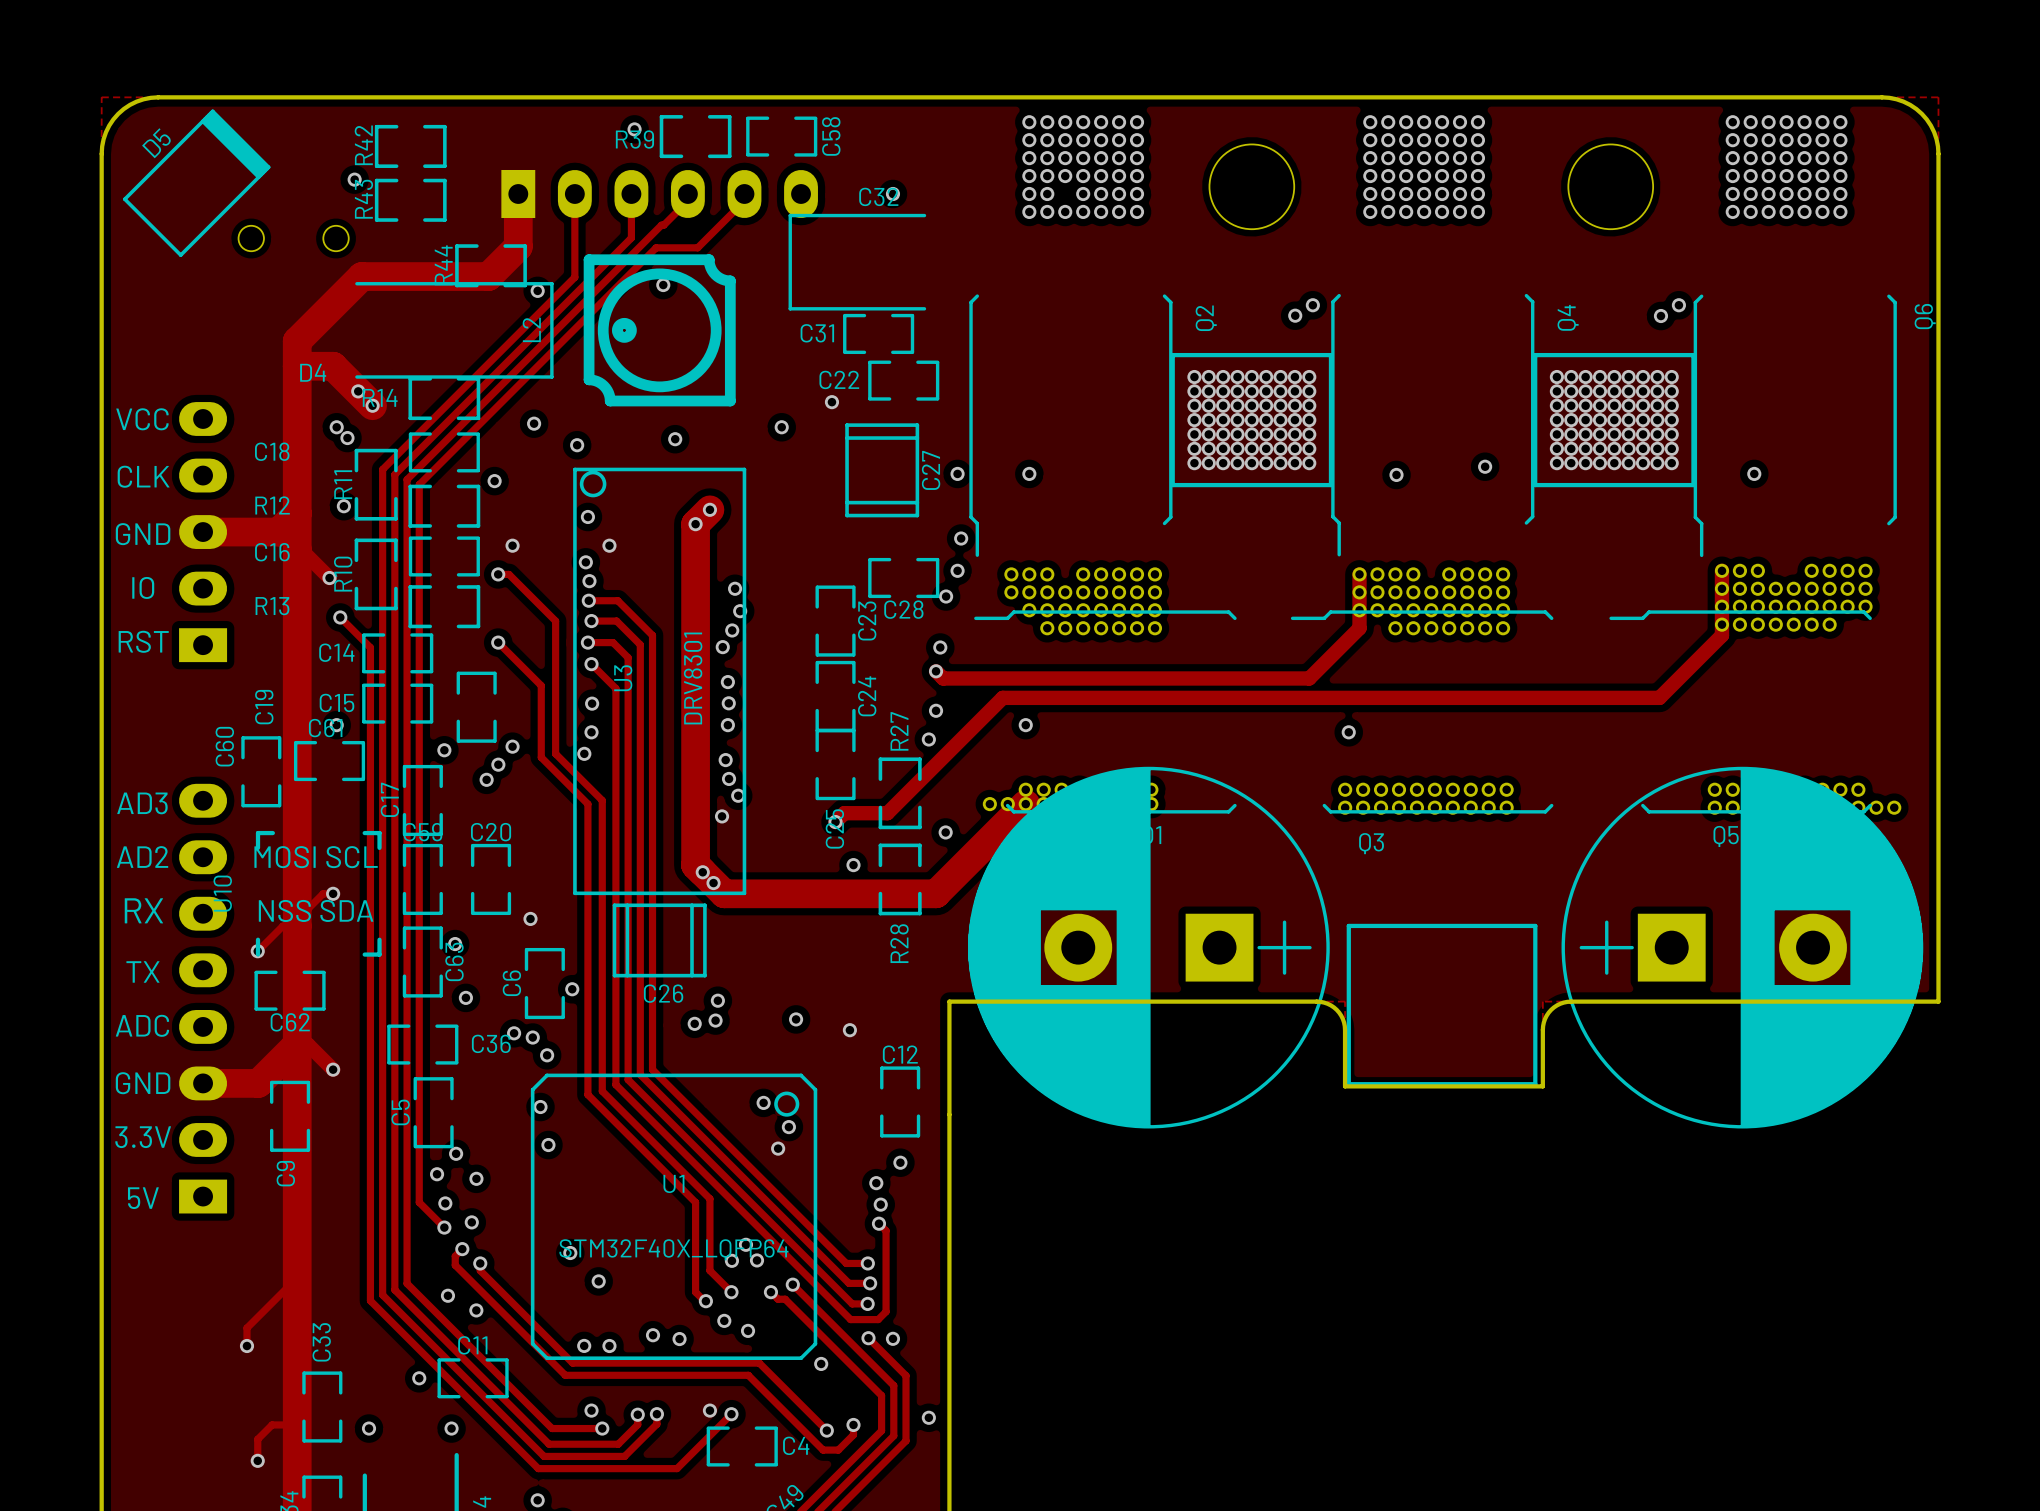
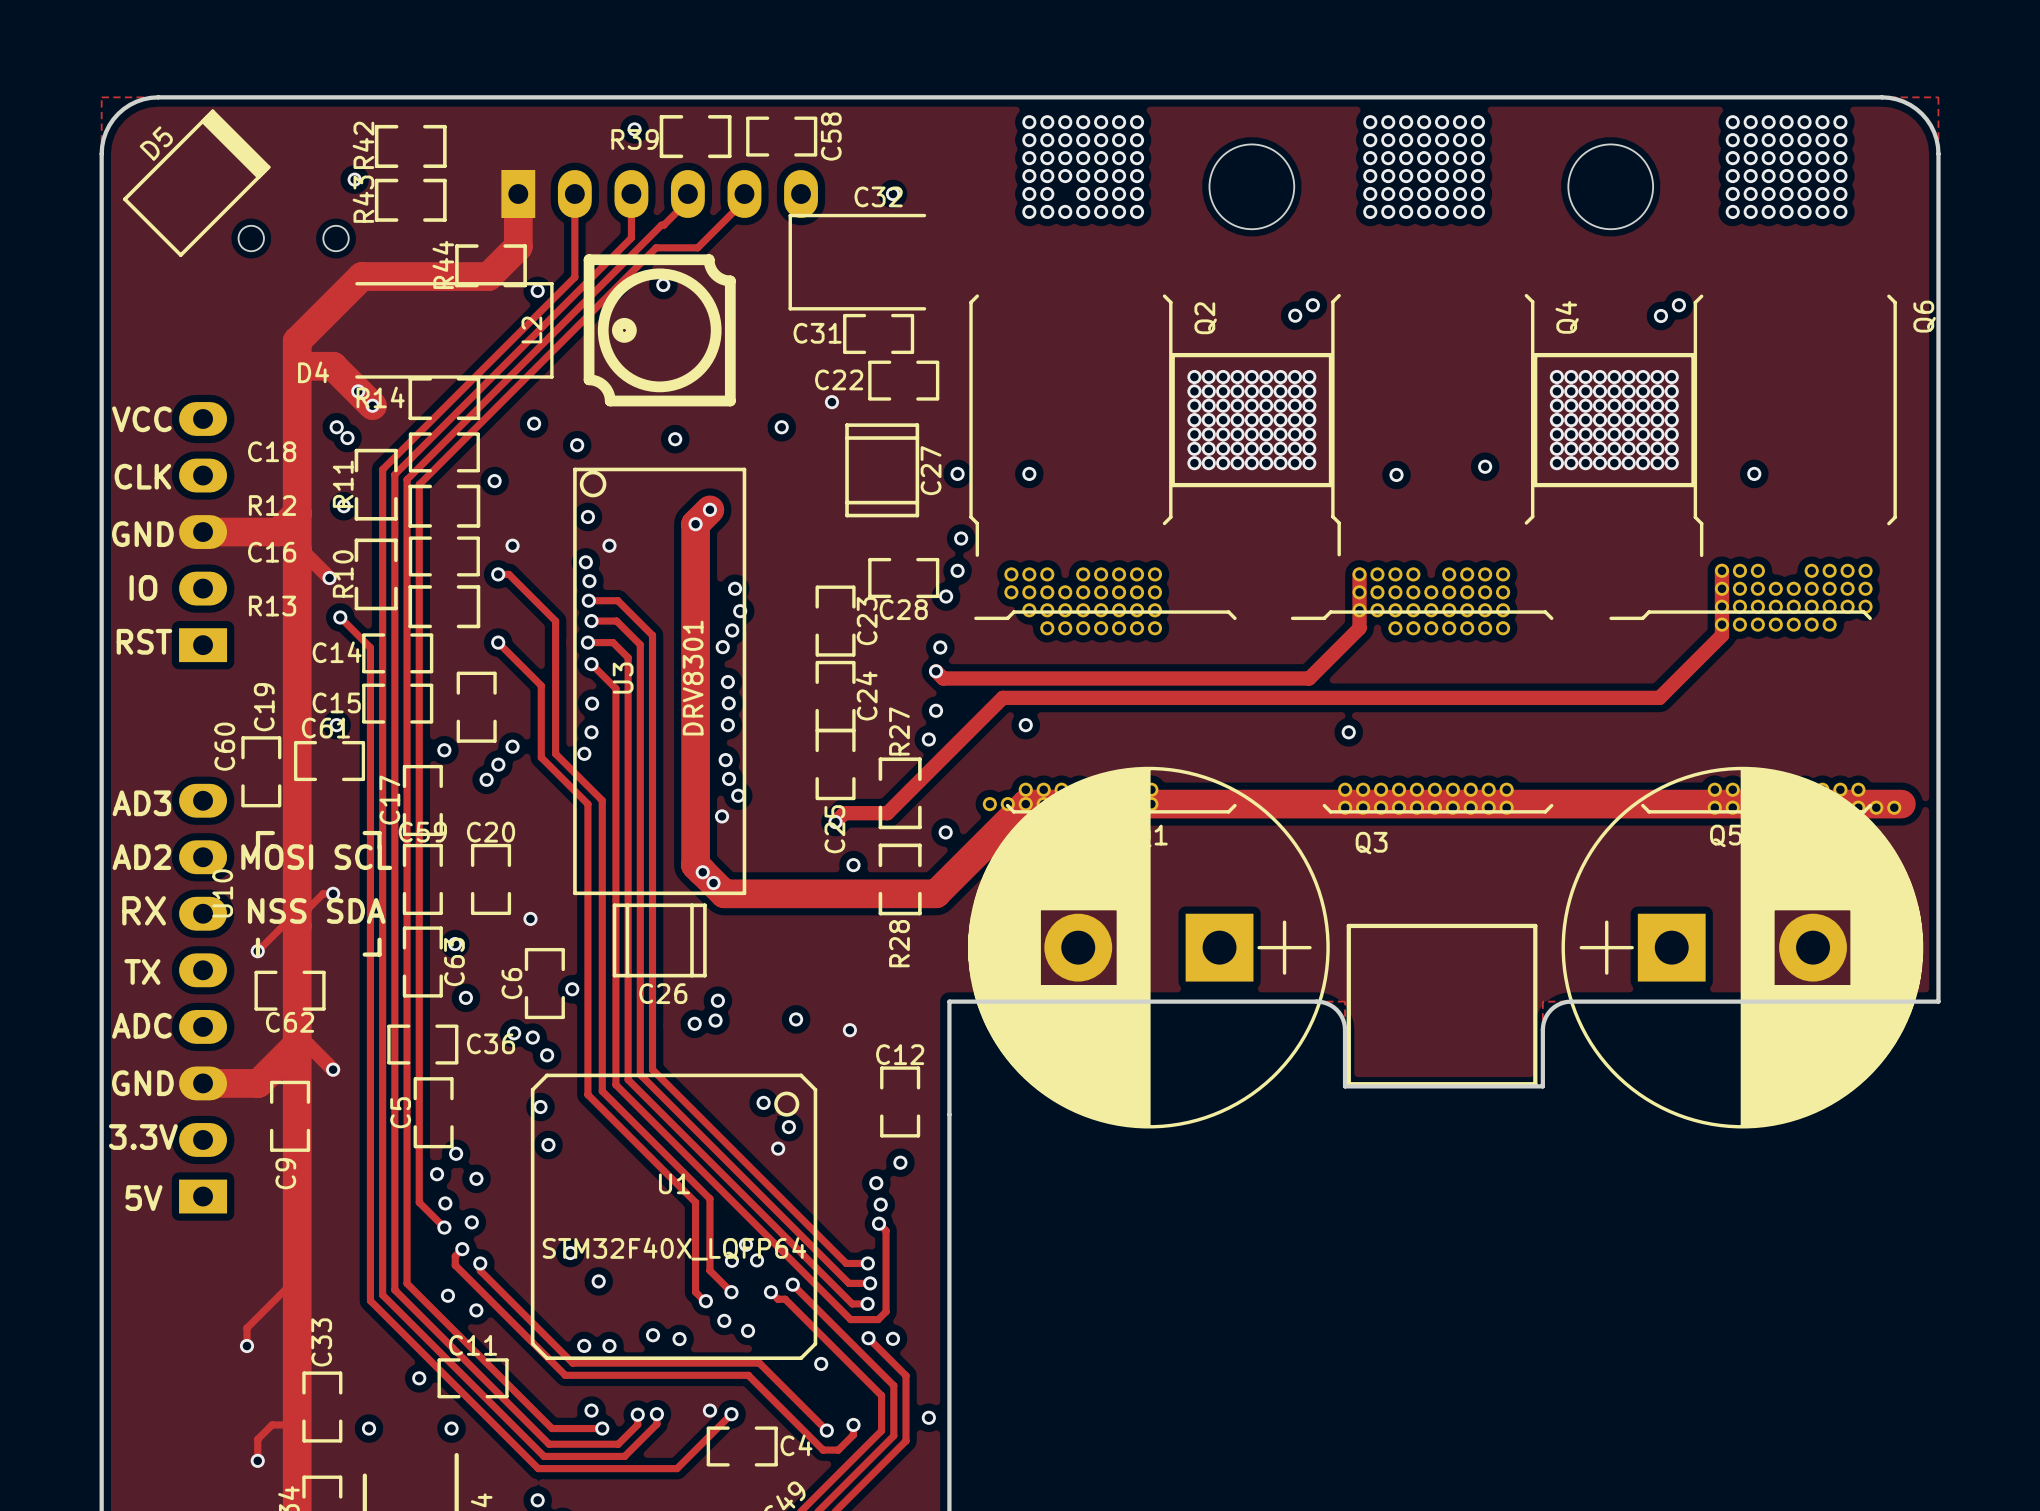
track: none -> (1025, 804) (1901, 804)

